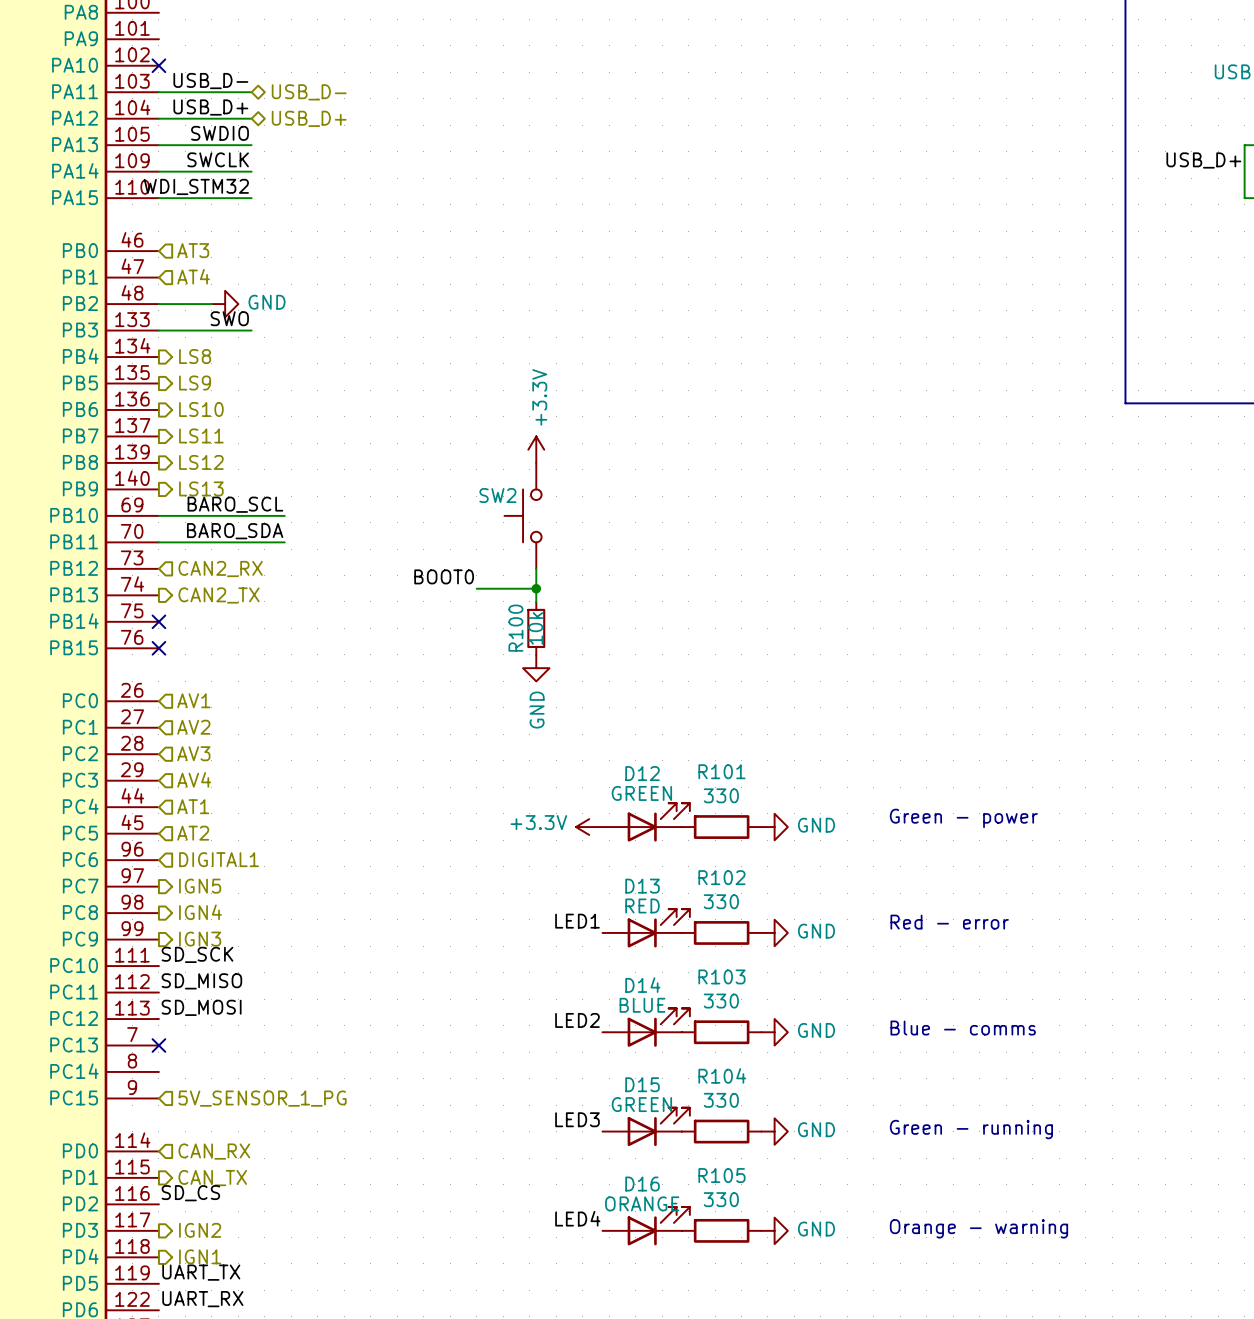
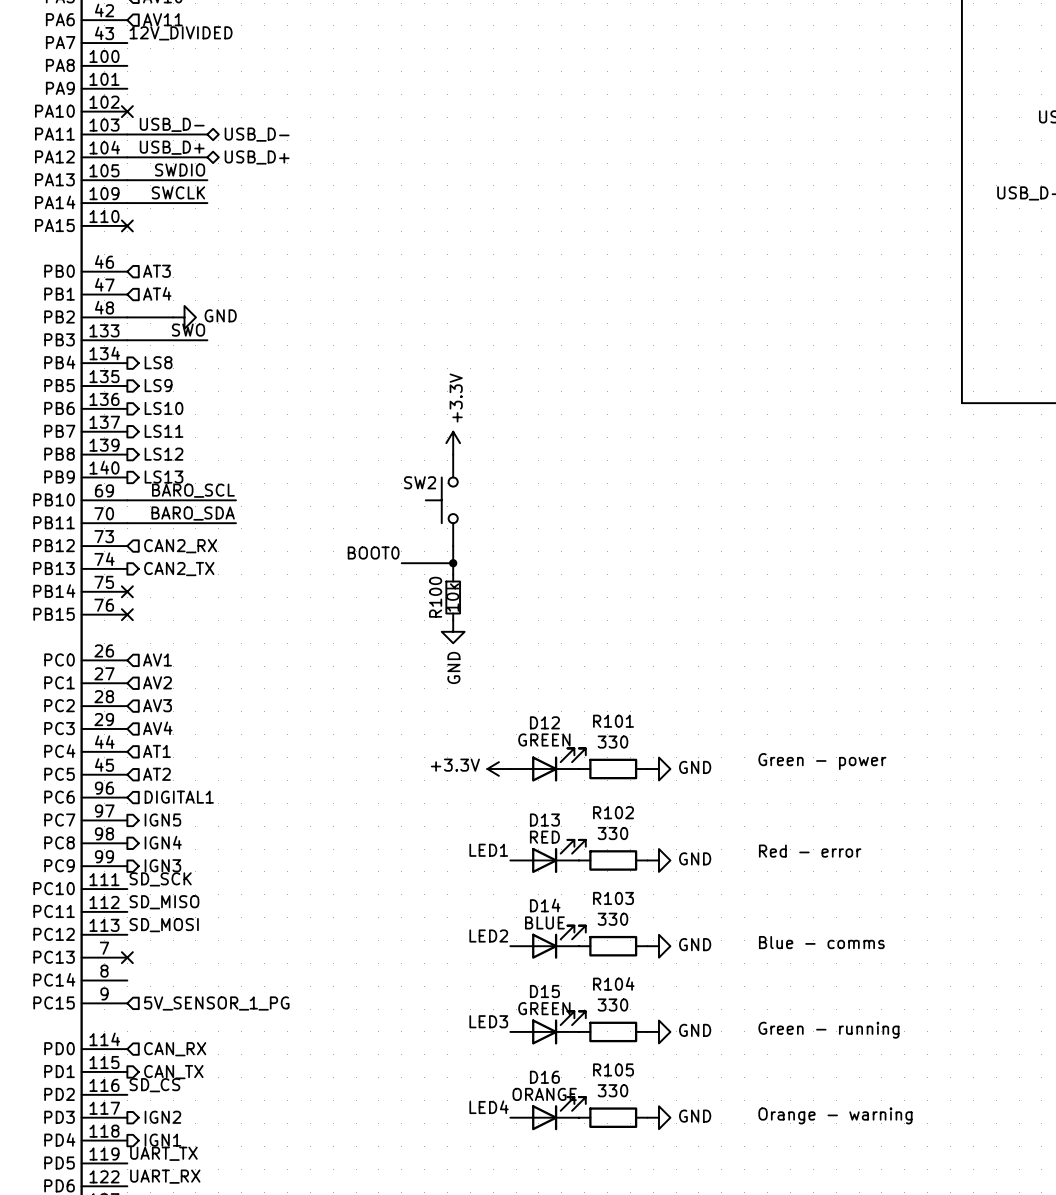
label: WDI_STM32 (196, 186) -> none
wire: (158, 198) (251, 198) -> none
no-connect mark: none -> (127, 225)

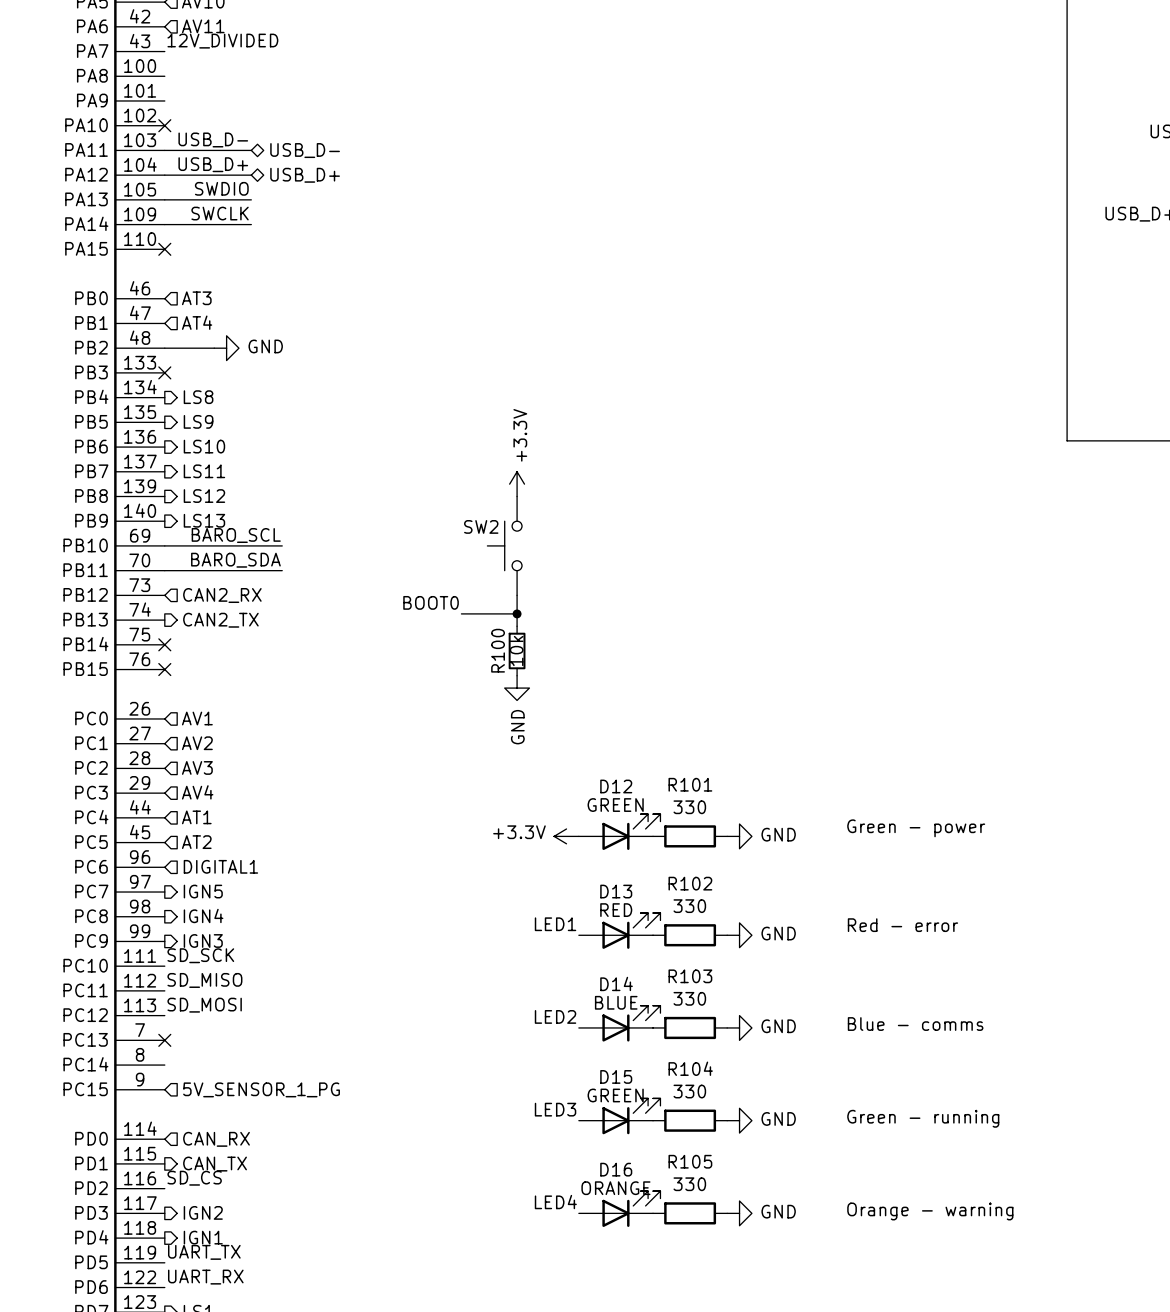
label: SWO (188, 330) -> none
wire: (127, 340) (207, 340) -> none
no-connect mark: none -> (164, 372)

